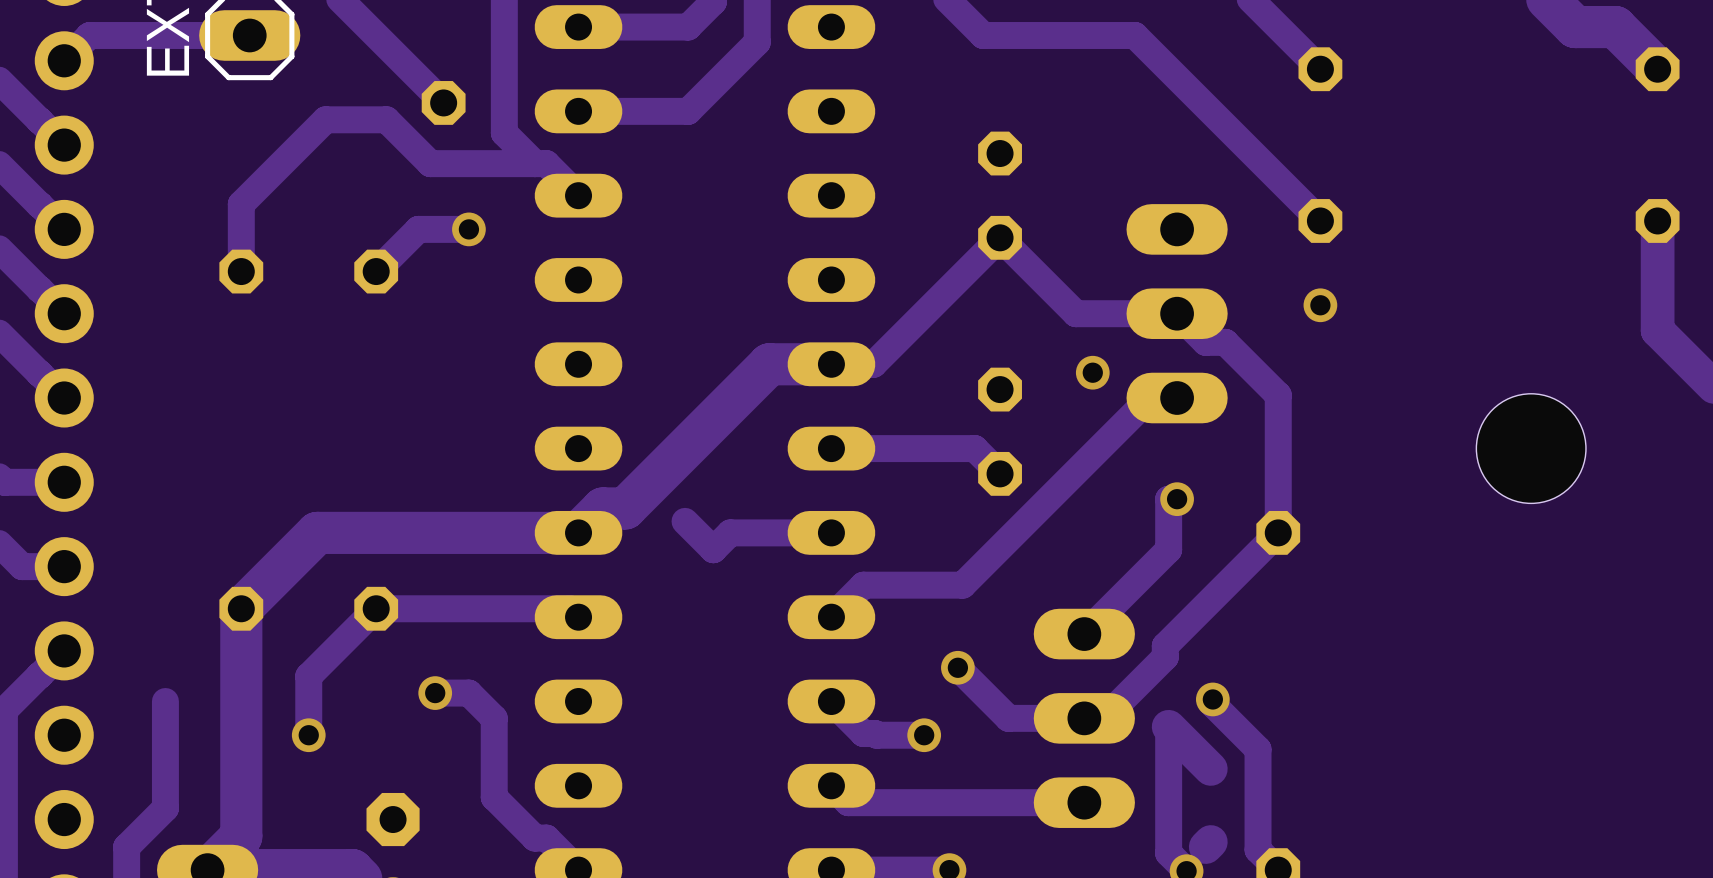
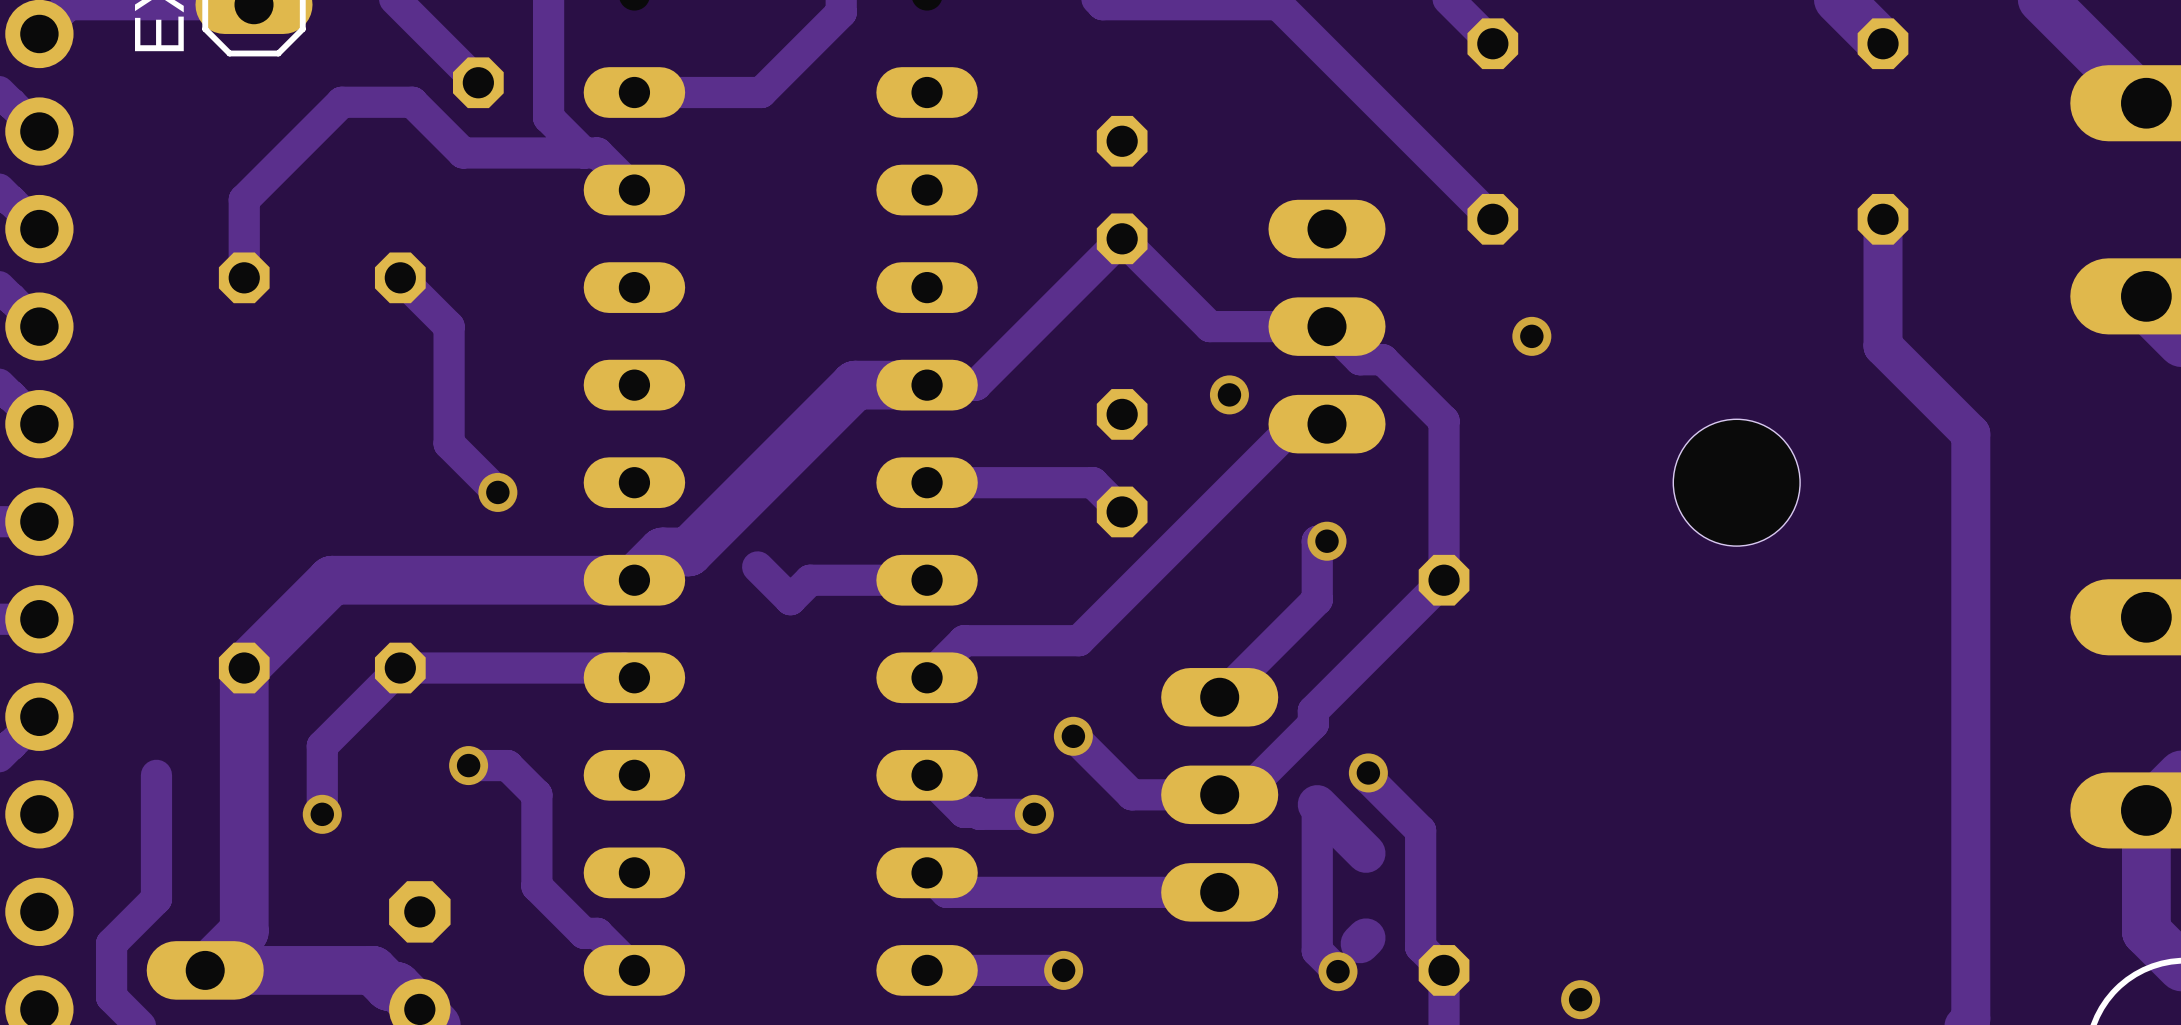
track: (468, 229) (418, 229) (376, 271) -> (497, 492) (449, 443) (449, 326) (400, 277)
via: (468, 229) -> none
via position: (1320, 305) -> (1531, 336)
via: none -> (497, 492)

